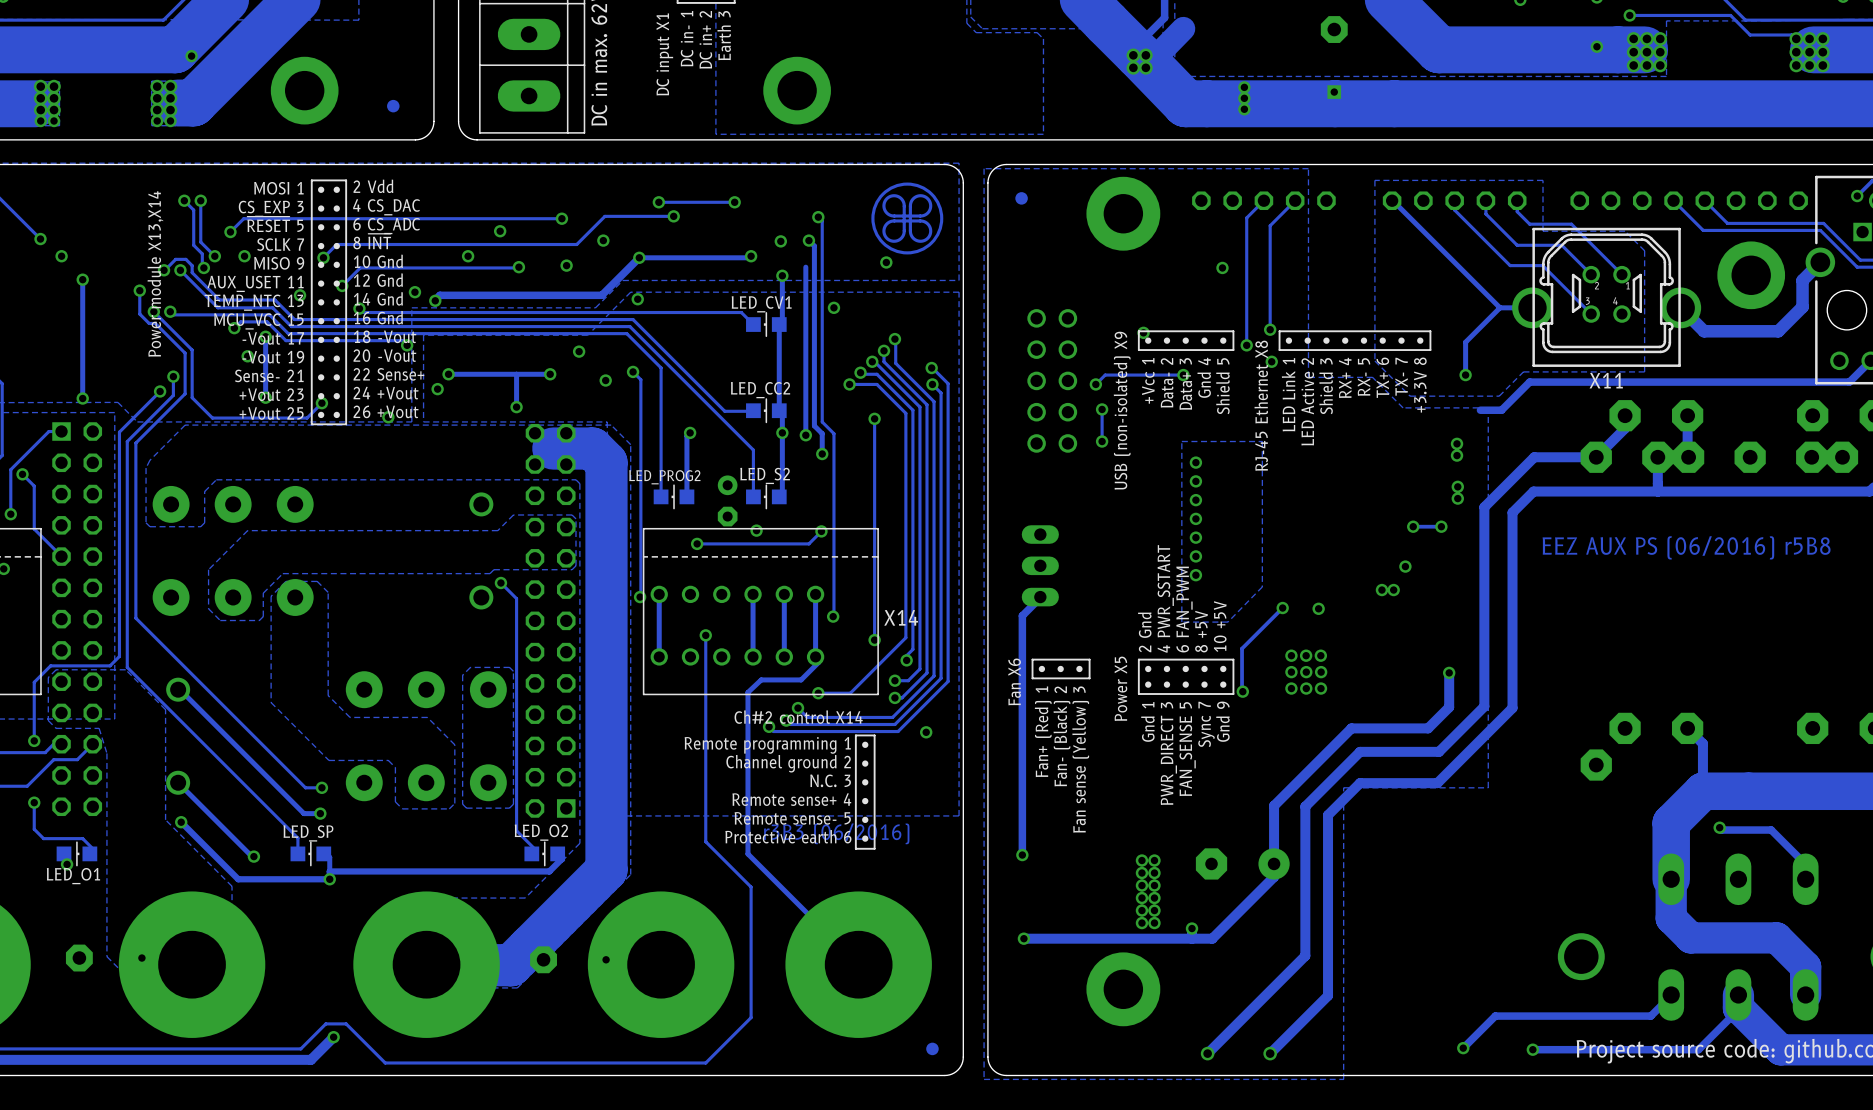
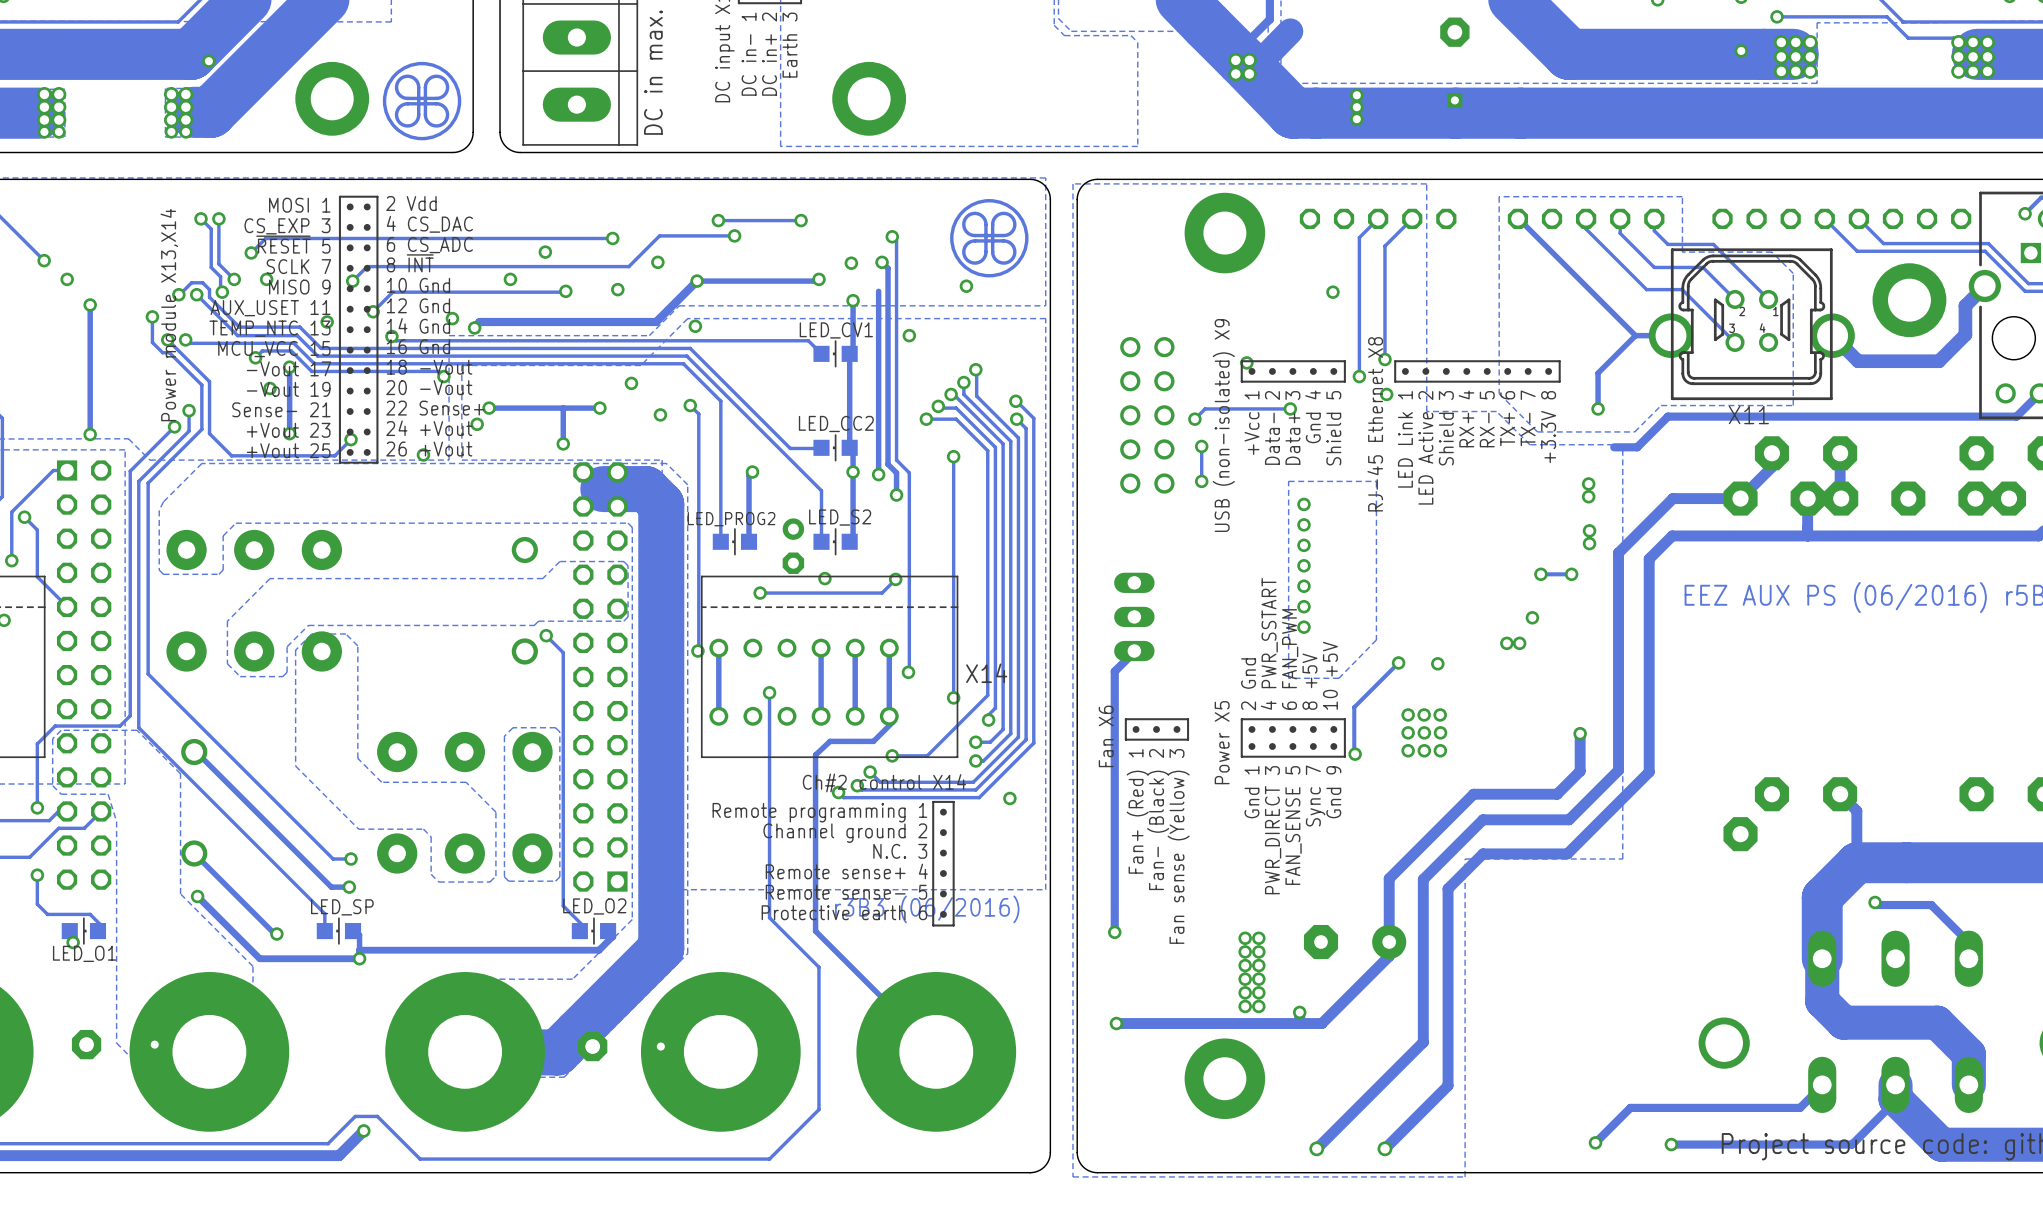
drawing: none -> [382, 61, 462, 141]
part: (393, 106) -> none
part: (1021, 198) -> none
part: (932, 1048) -> none

